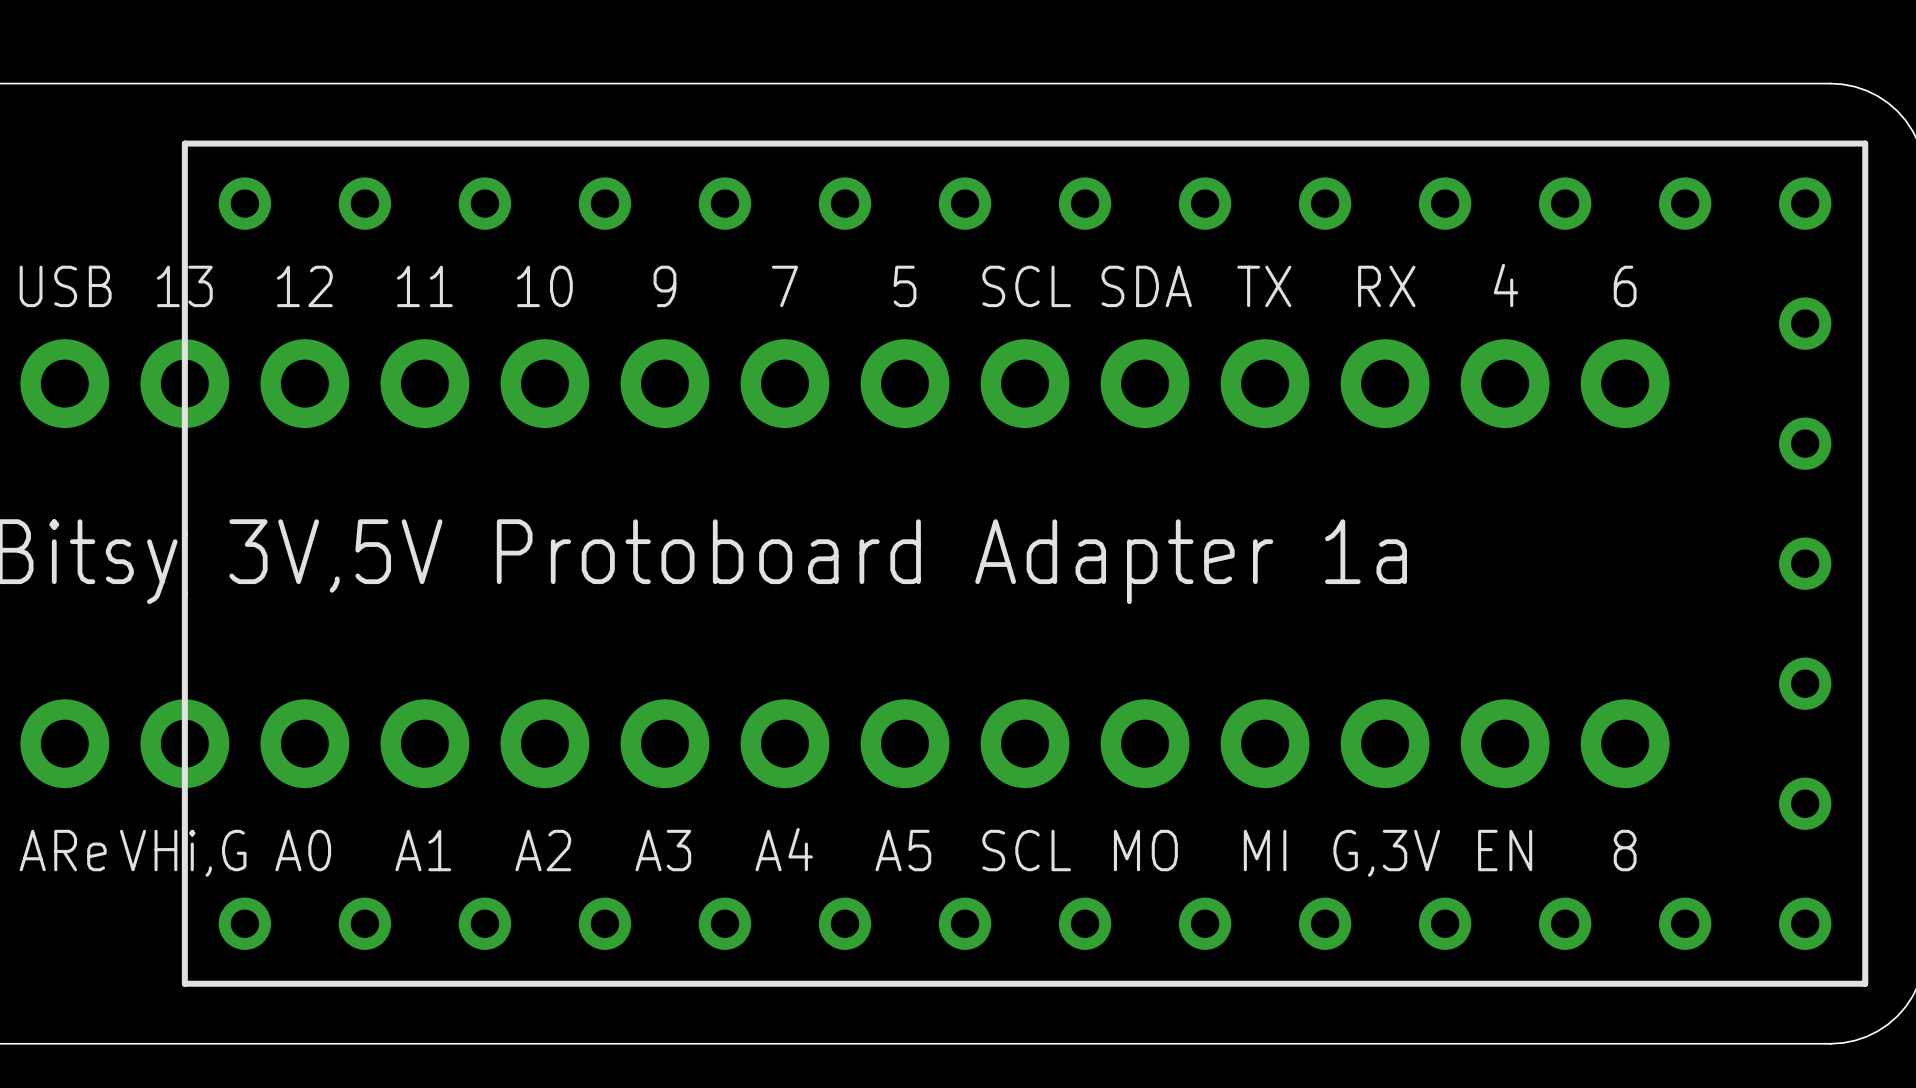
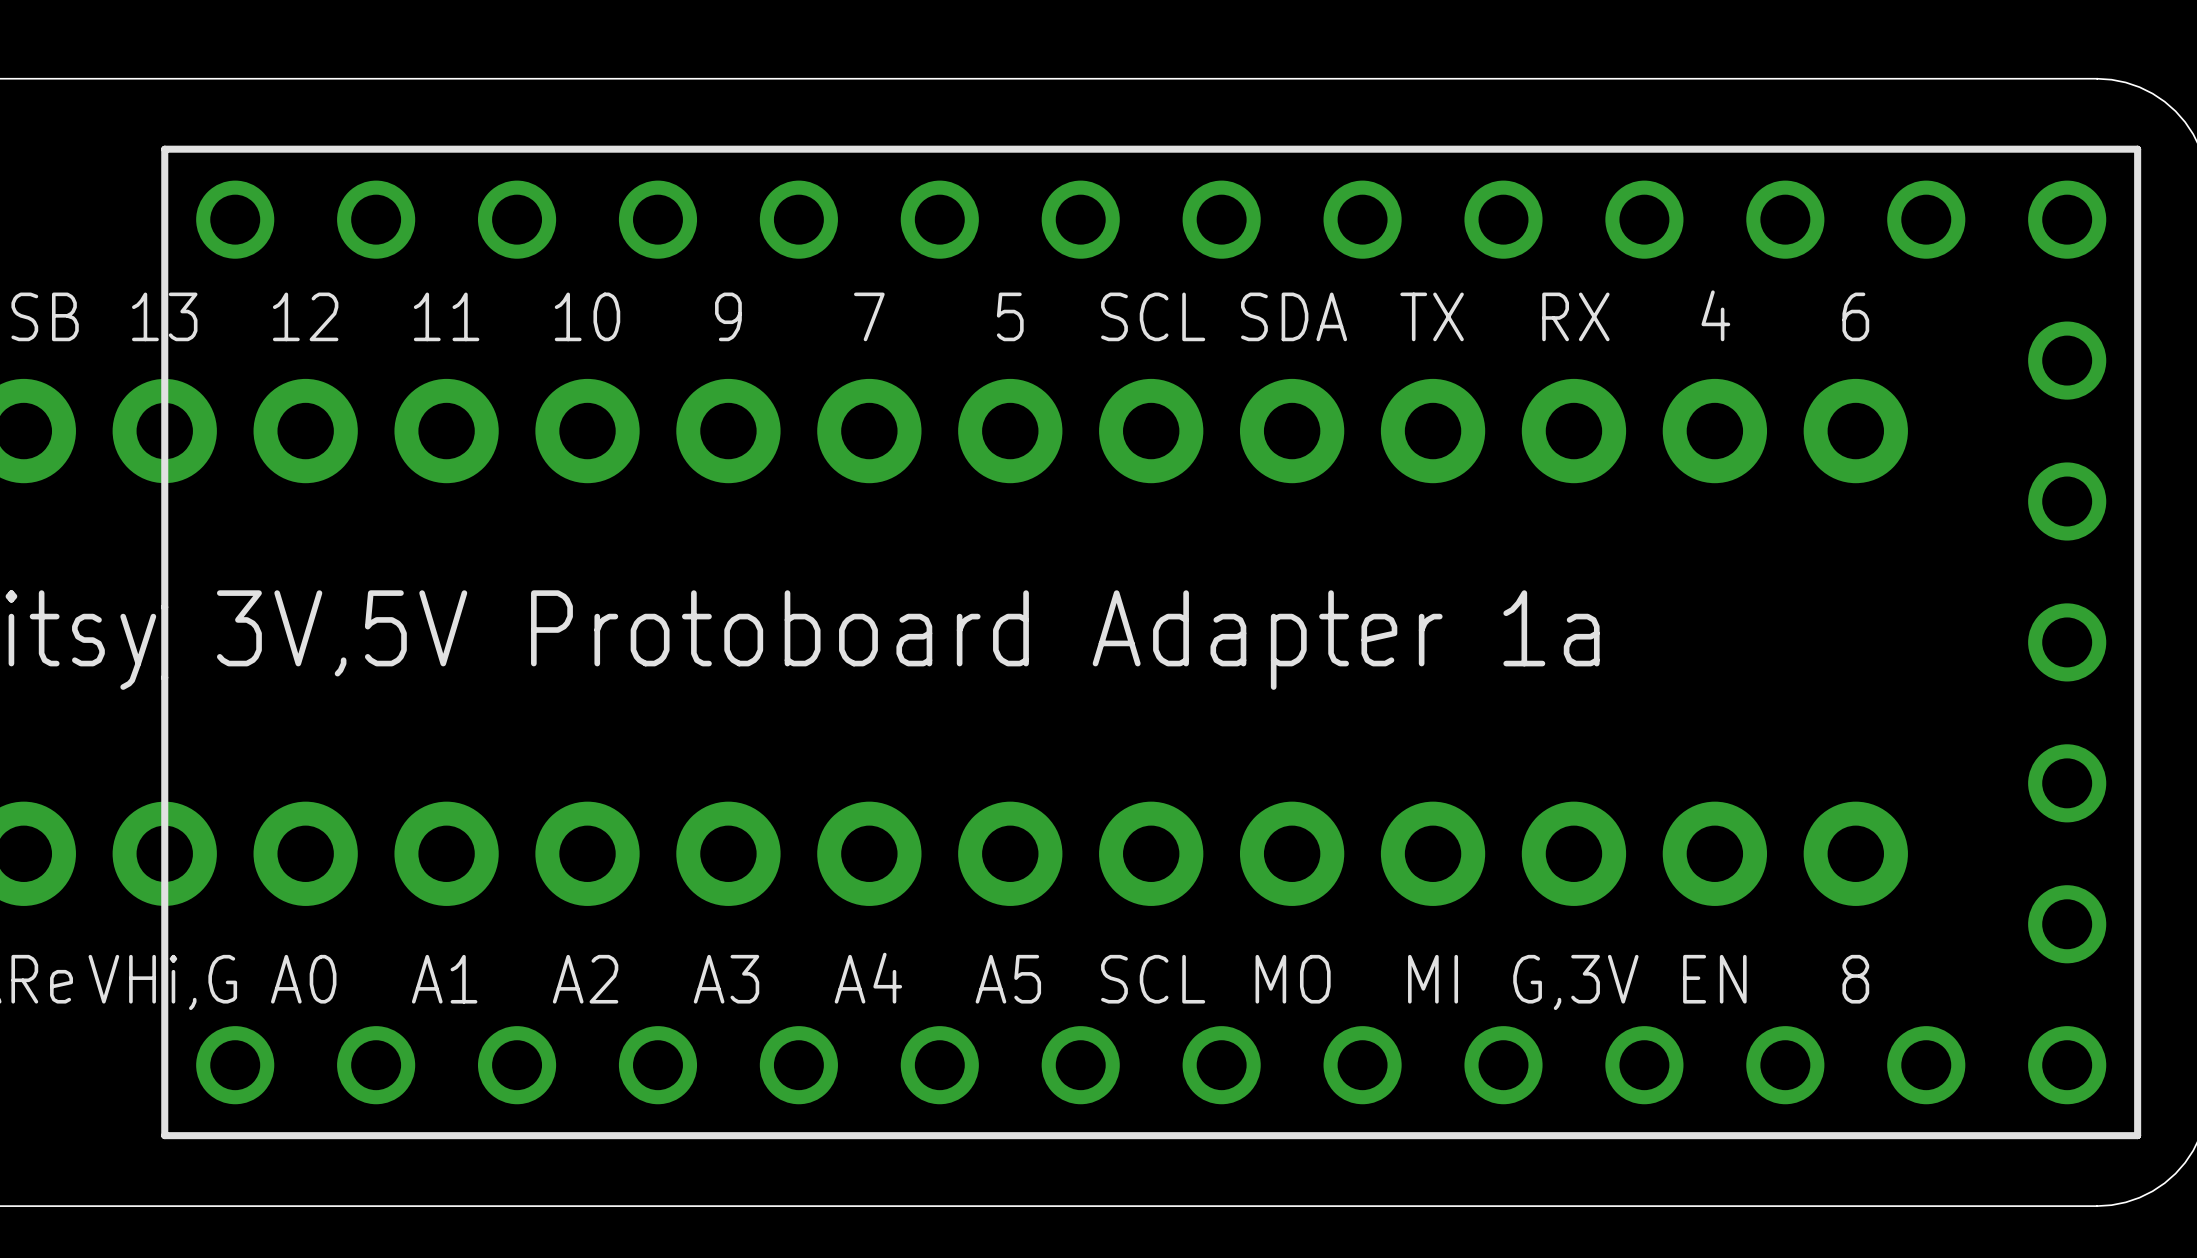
part footprint: [181, 140, 1869, 987] -> [161, 145, 2142, 1140]

